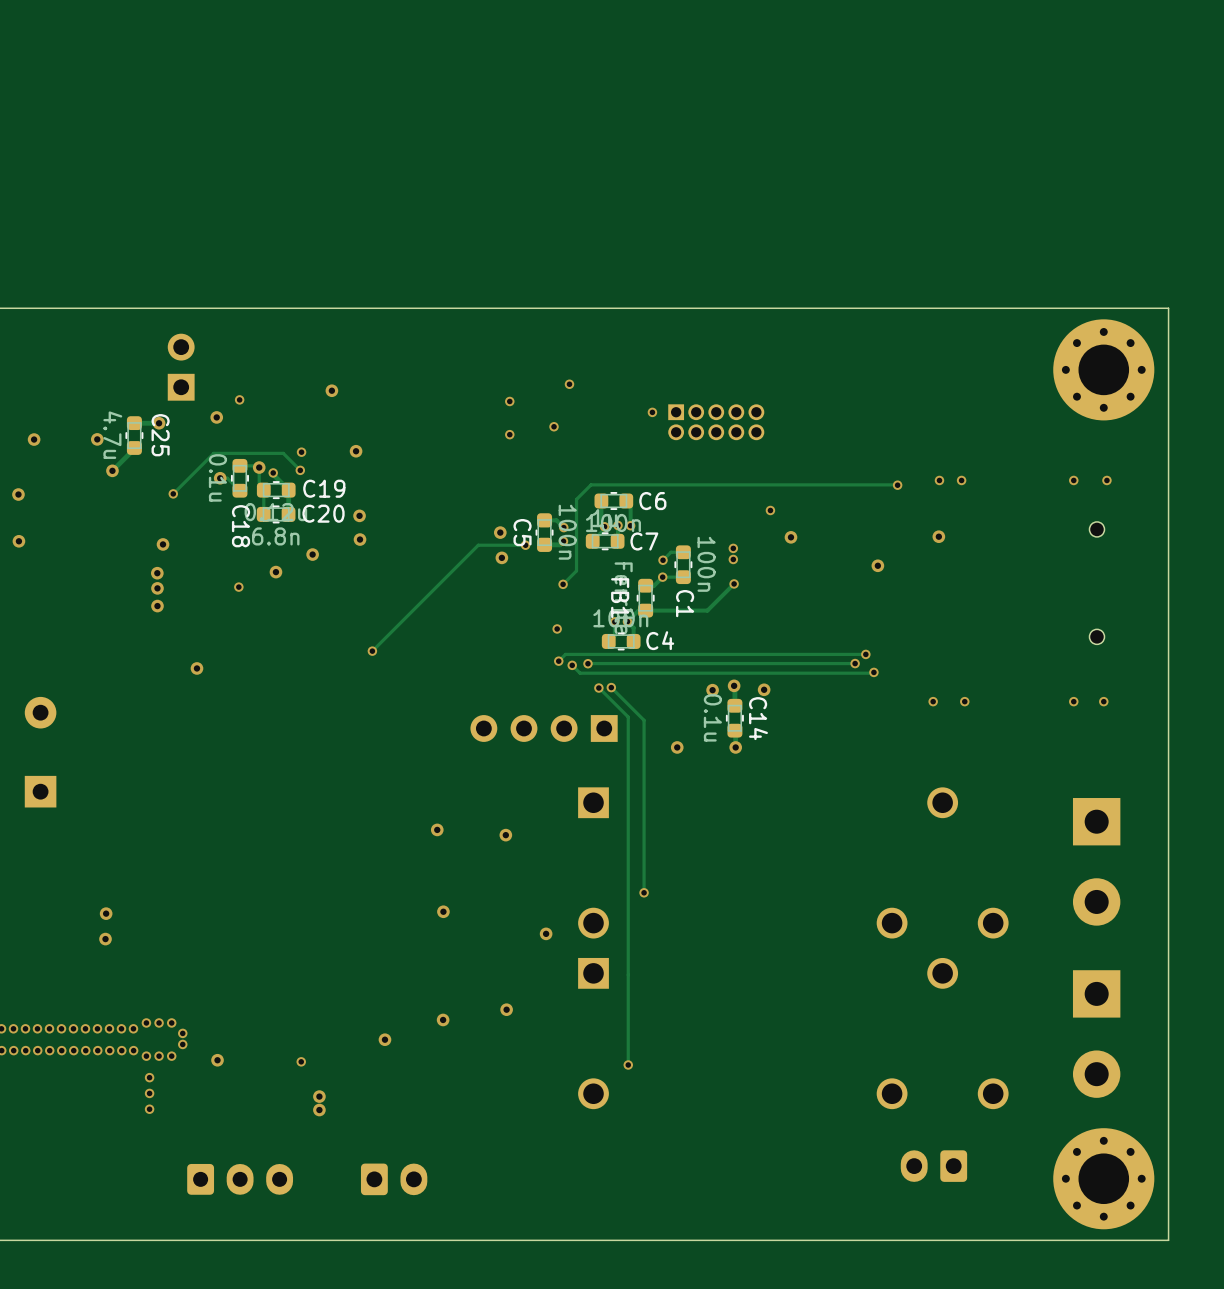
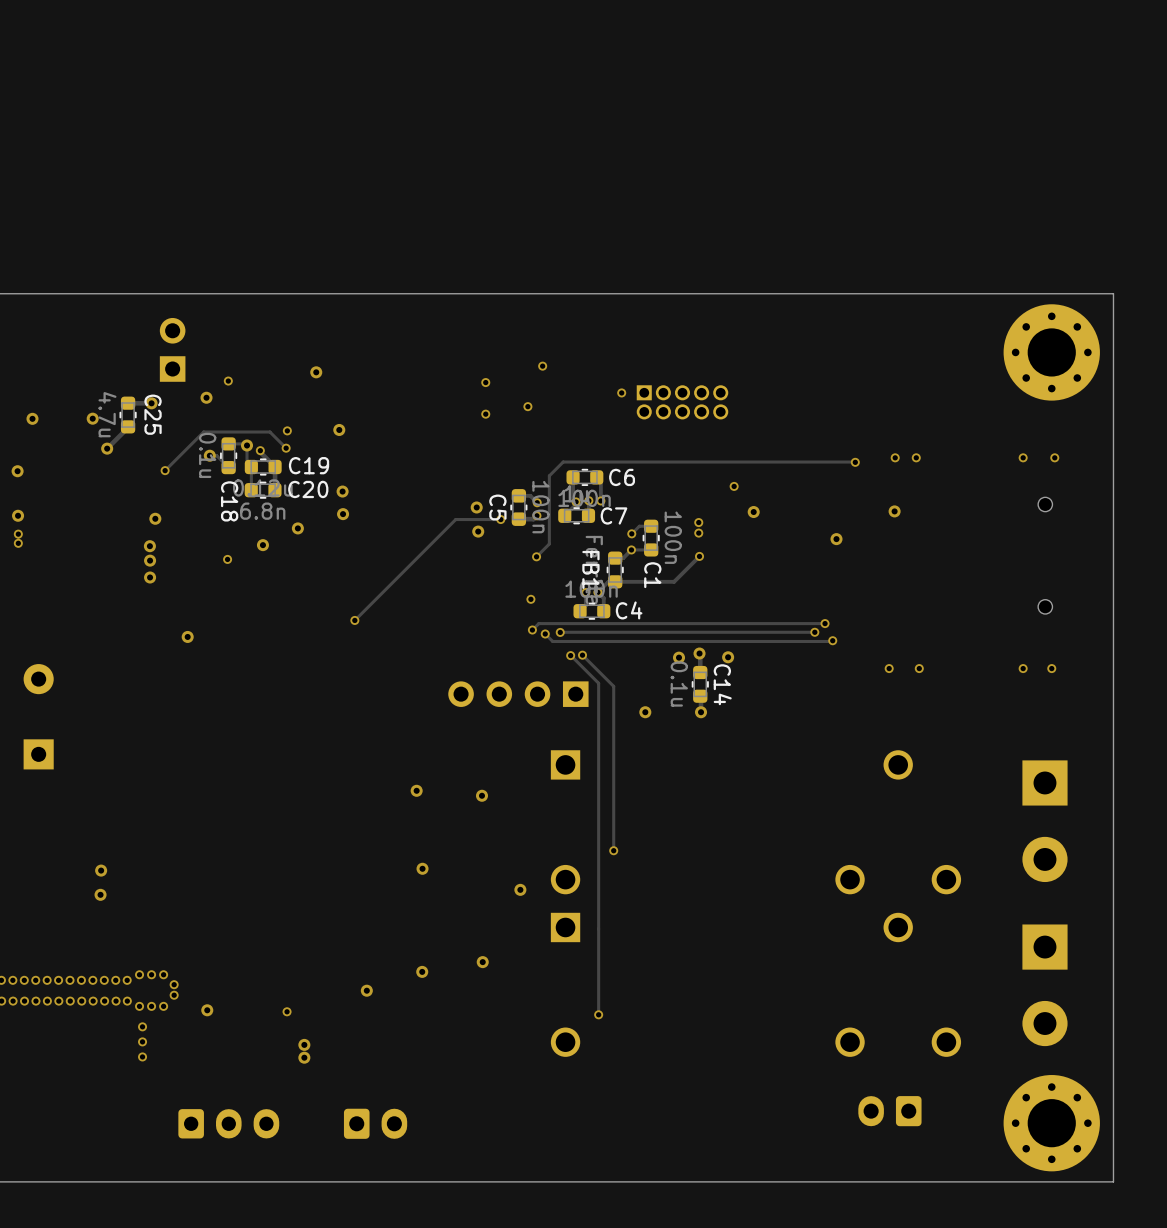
via: none -> (18, 534)
via: none -> (18, 543)

